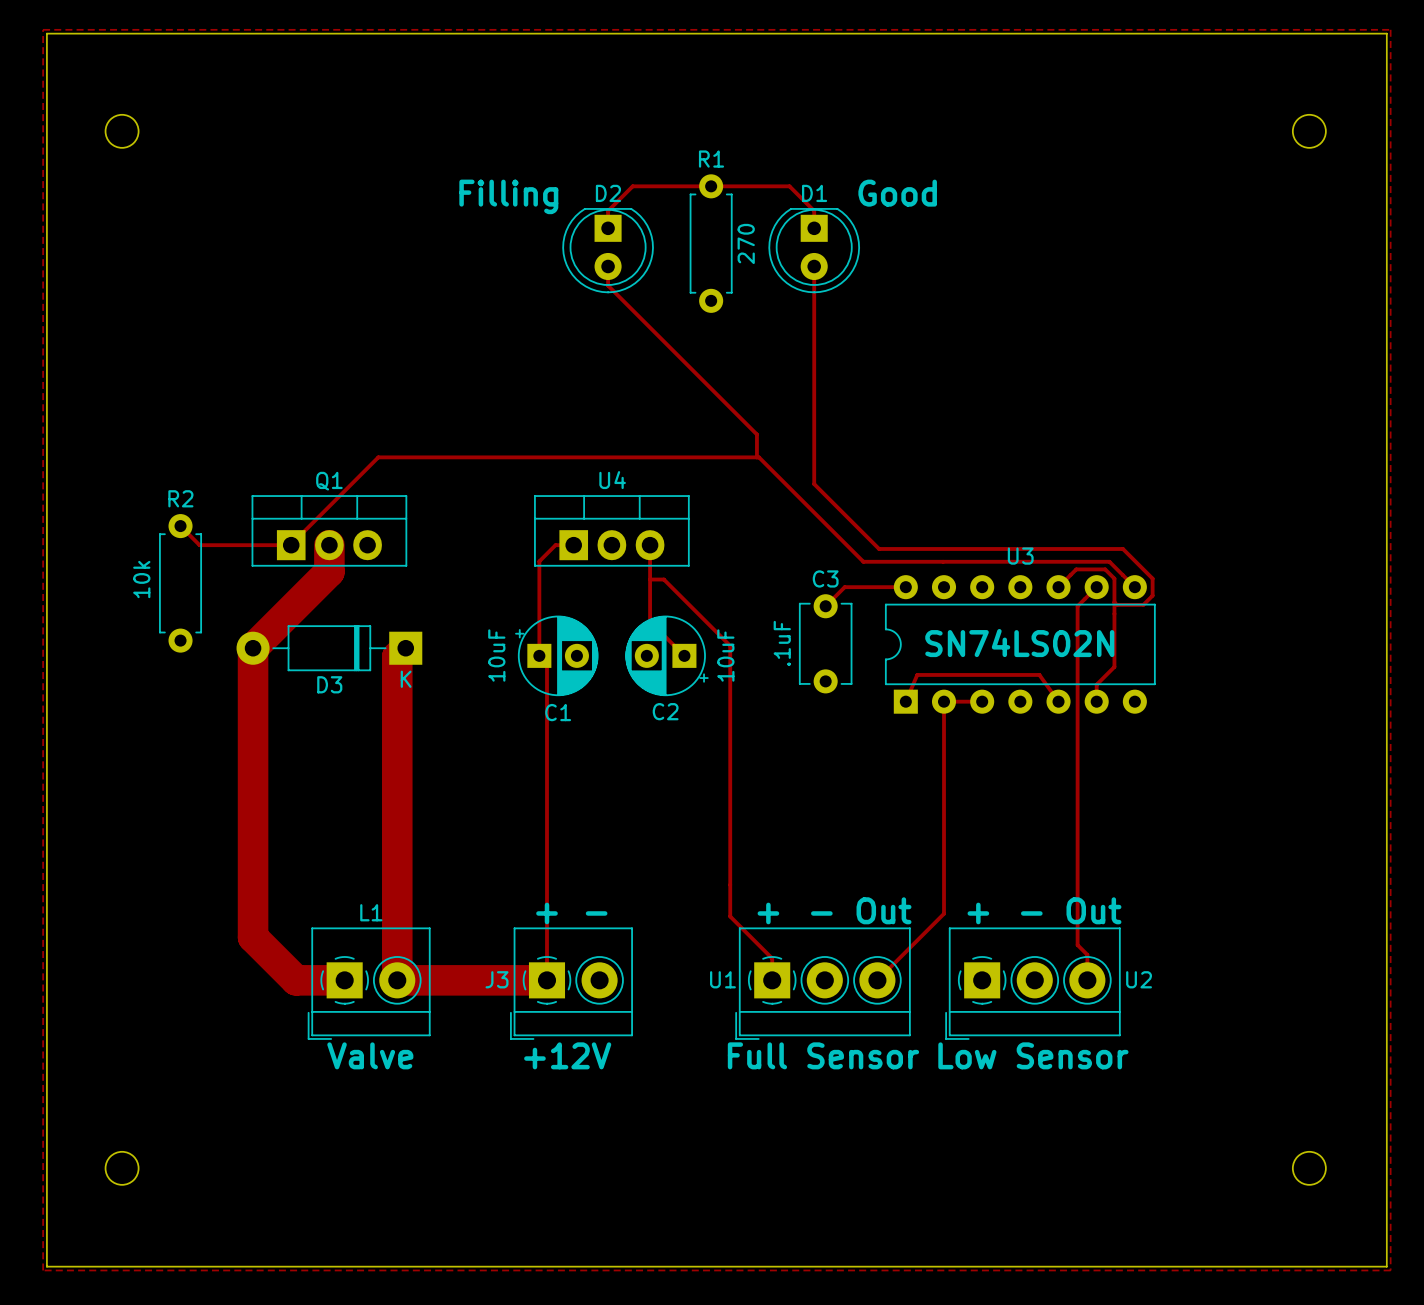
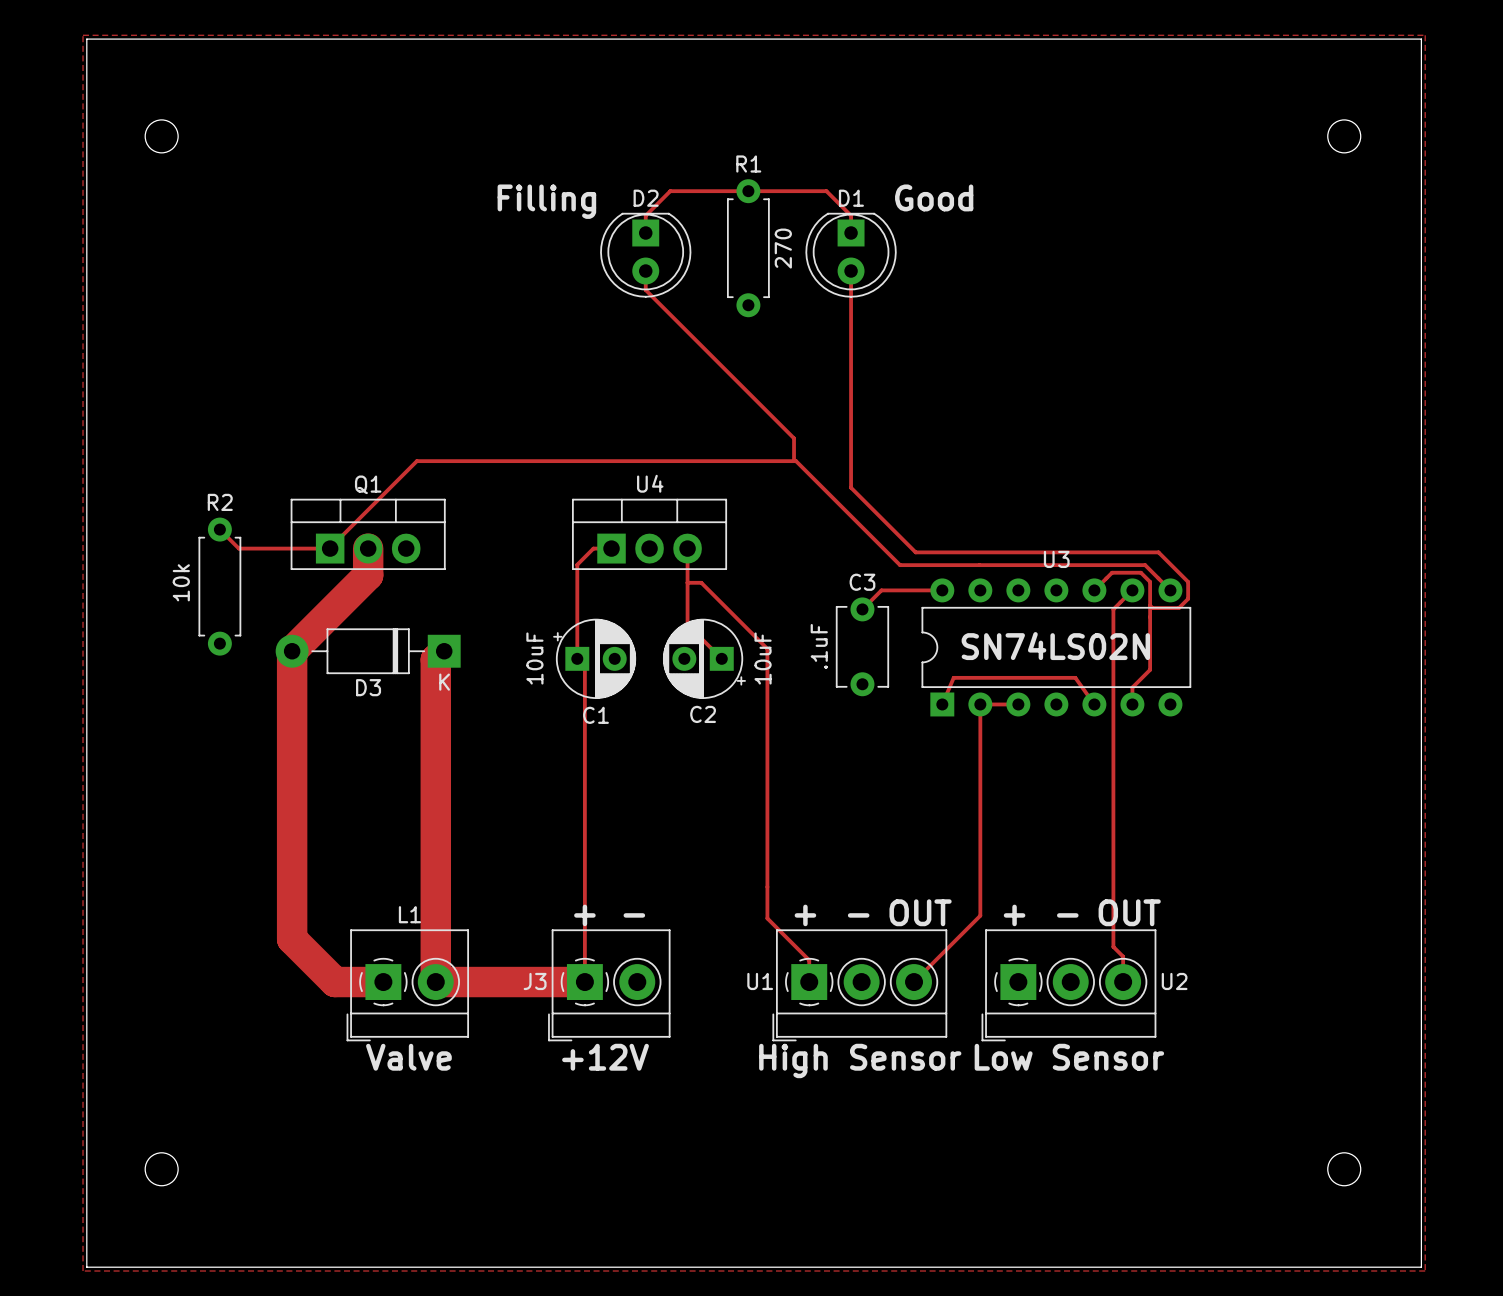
text: Out (884, 910) -> OUT (920, 912)
text: Out (1093, 910) -> OUT (1129, 912)
text: Full Sensor (823, 1055) -> High Sensor (860, 1060)

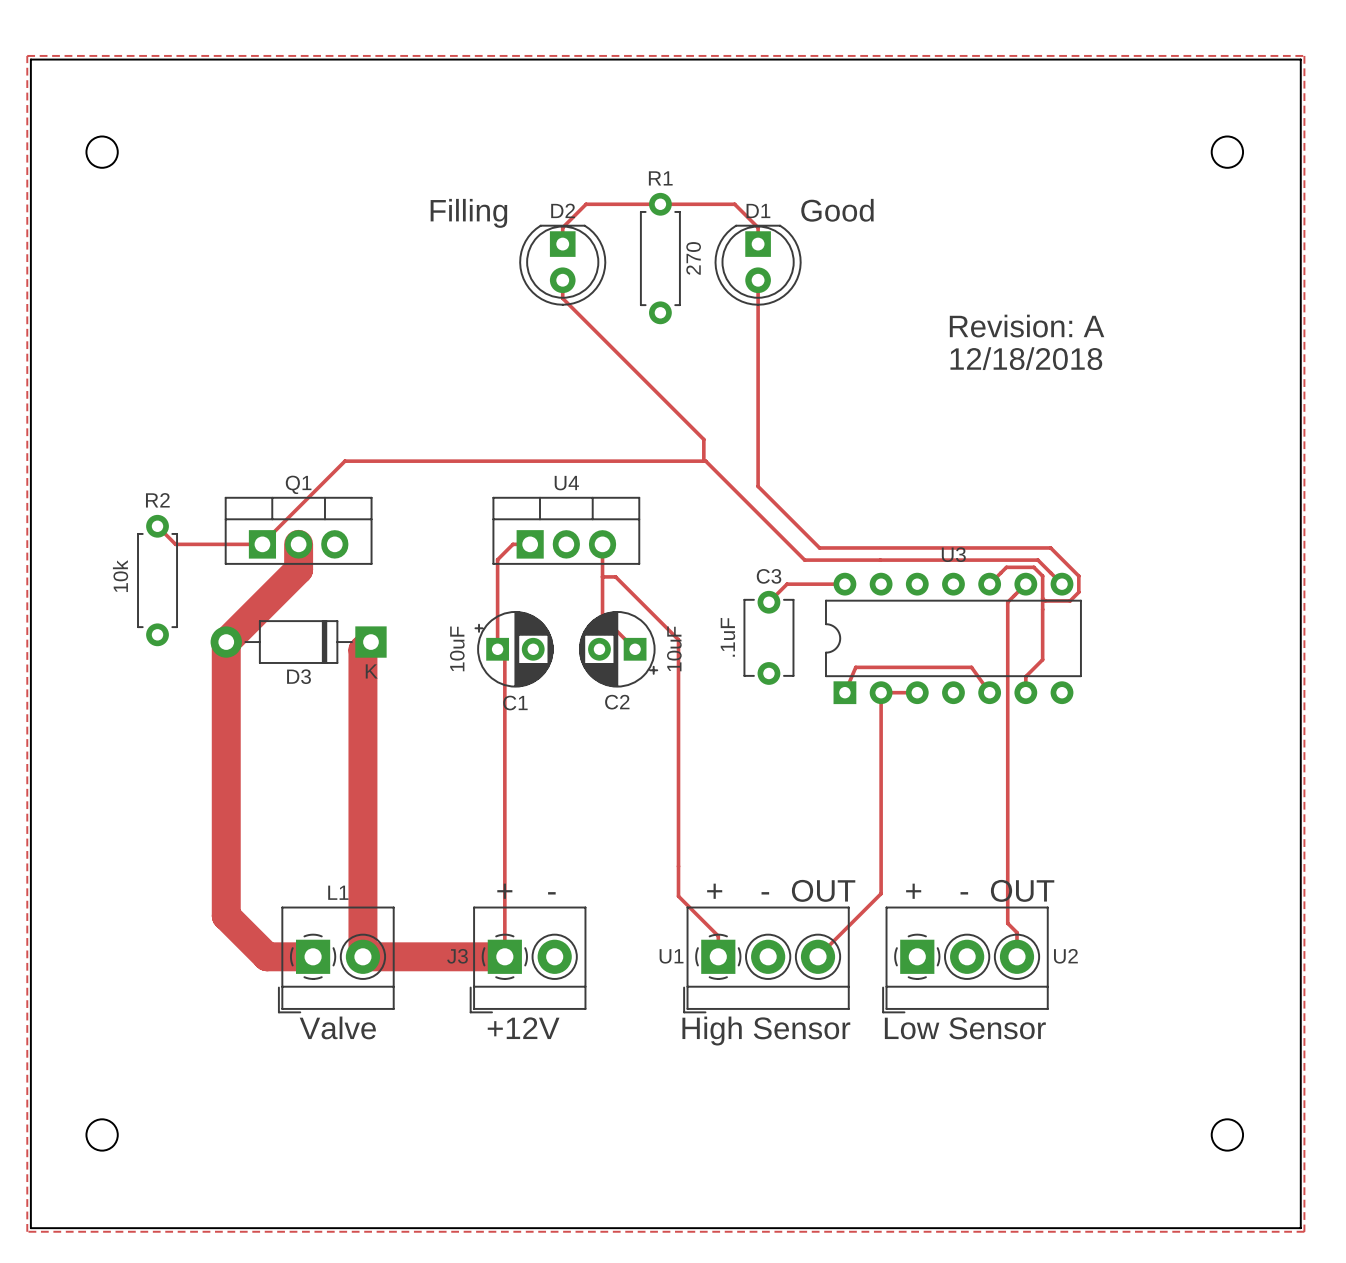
text: none -> Revision: A (1027, 326)
text: none -> 12/18/2018 (1026, 358)
text: SN74LS02N (1055, 646) -> none

